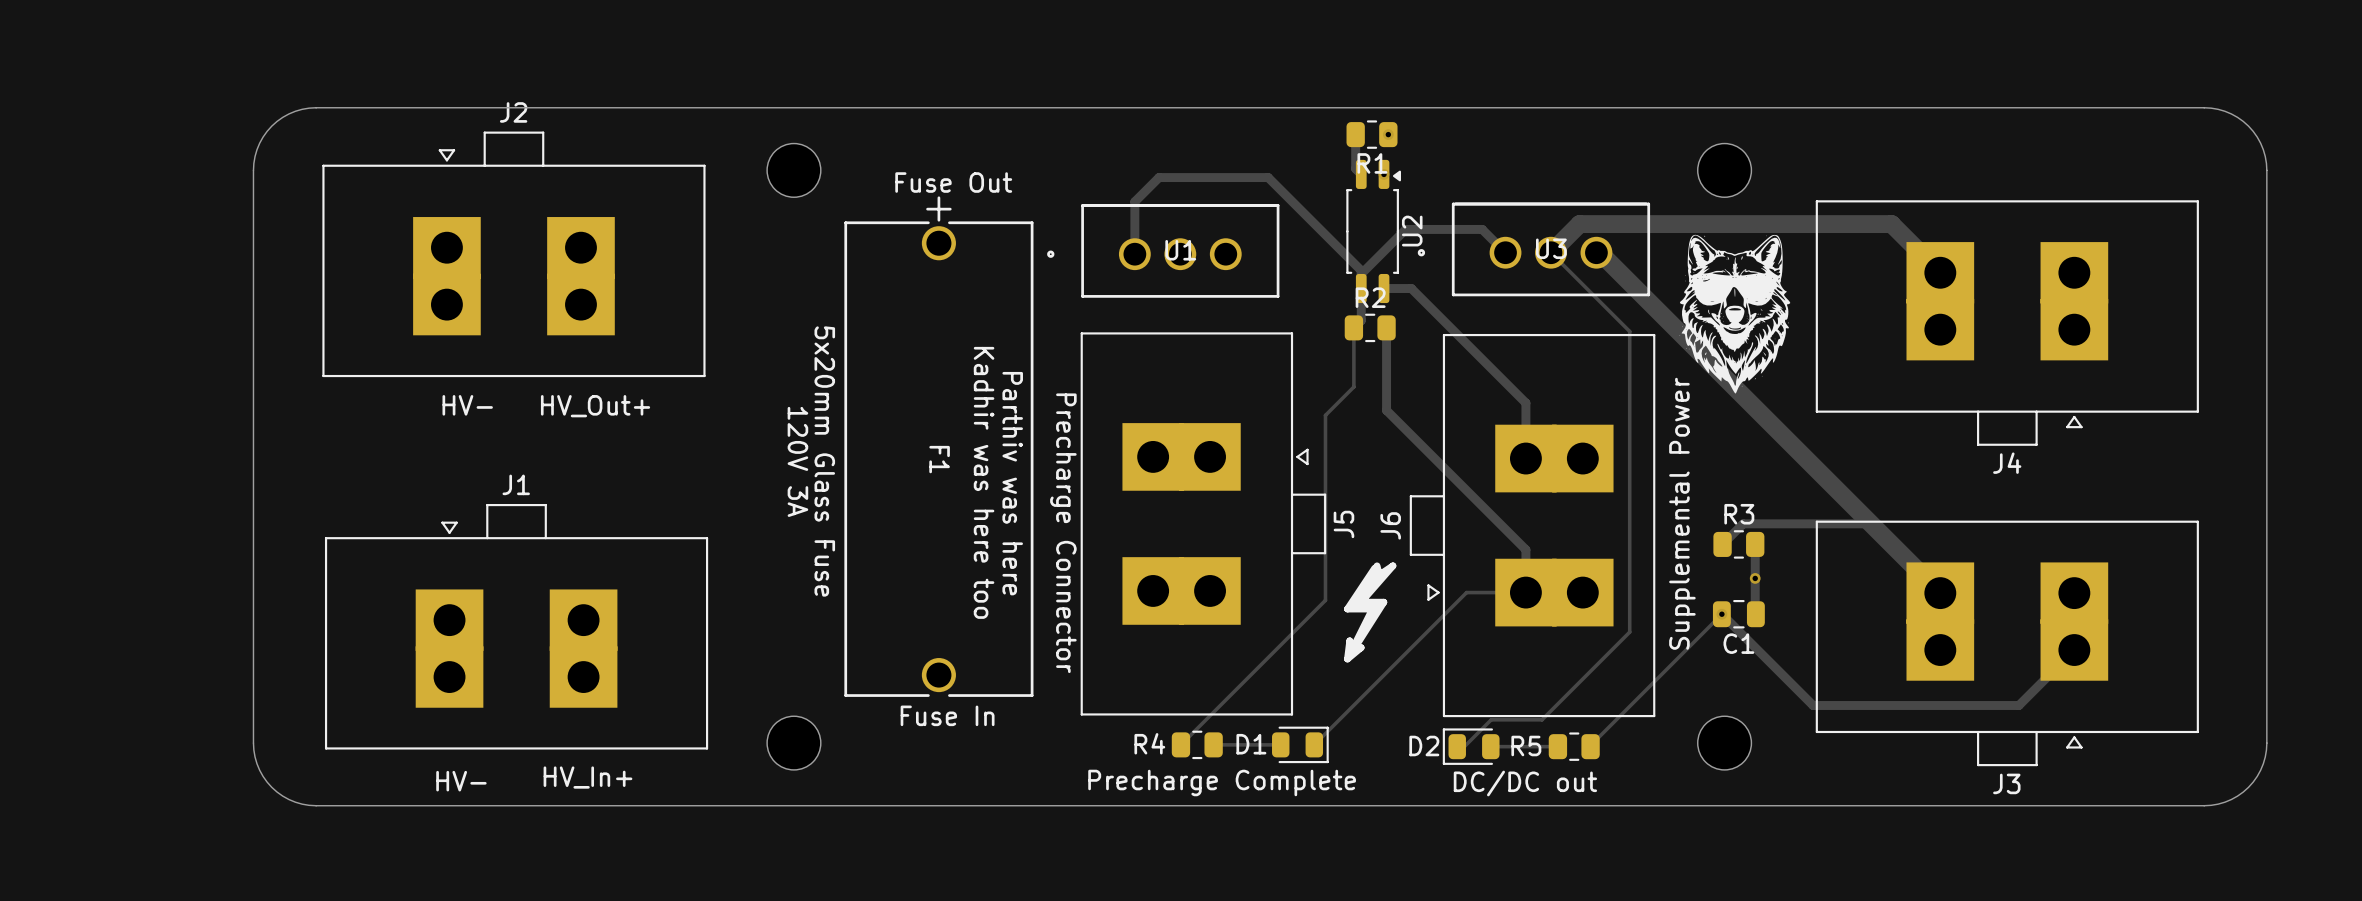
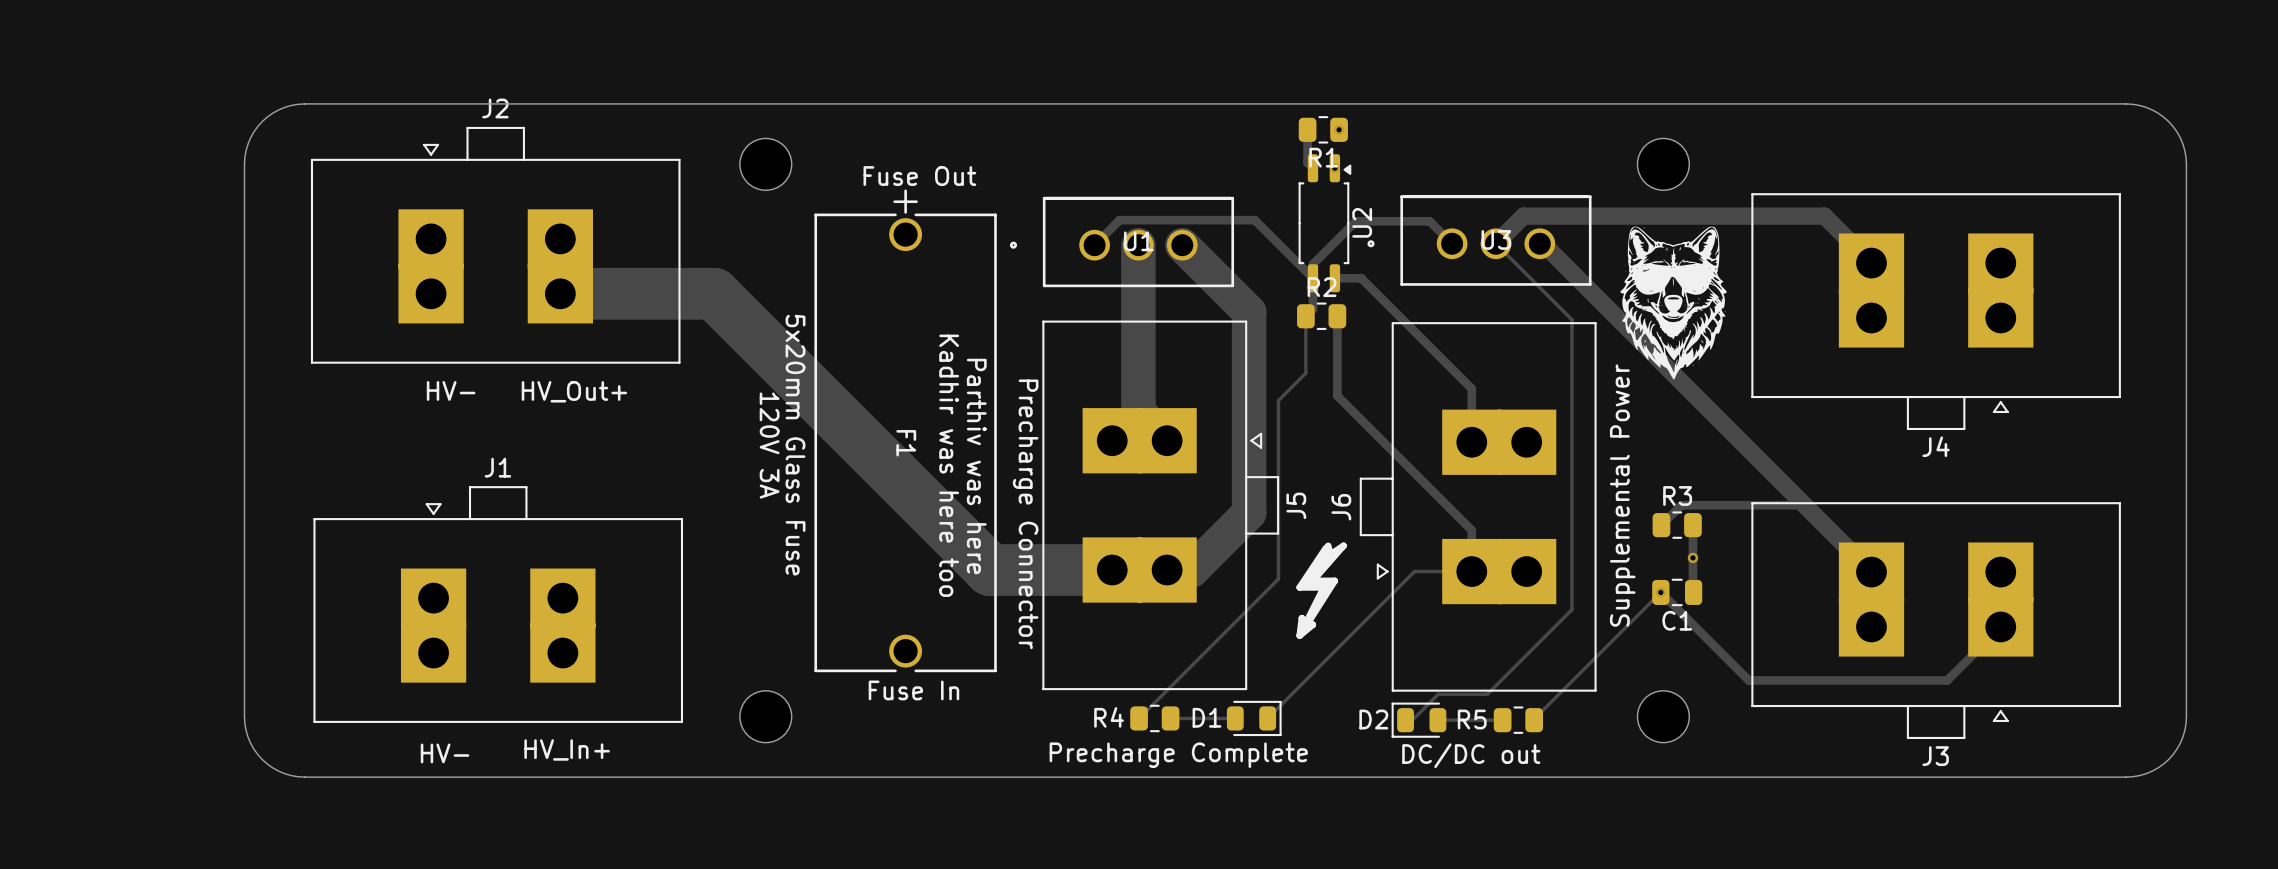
track: (1134, 254) (1134, 201) (1159, 177) (1268, 177) (1361, 270) (1361, 273) -> (1094, 245) (1119, 220) (1254, 220) (1312, 278)
track: none -> (1138, 245) (1138, 412) (1167, 440)
track: none -> (1182, 245) (1249, 312) (1249, 513) (1192, 570) (1167, 570)
track: none -> (560, 293) (714, 293) (990, 570) (1112, 570)

